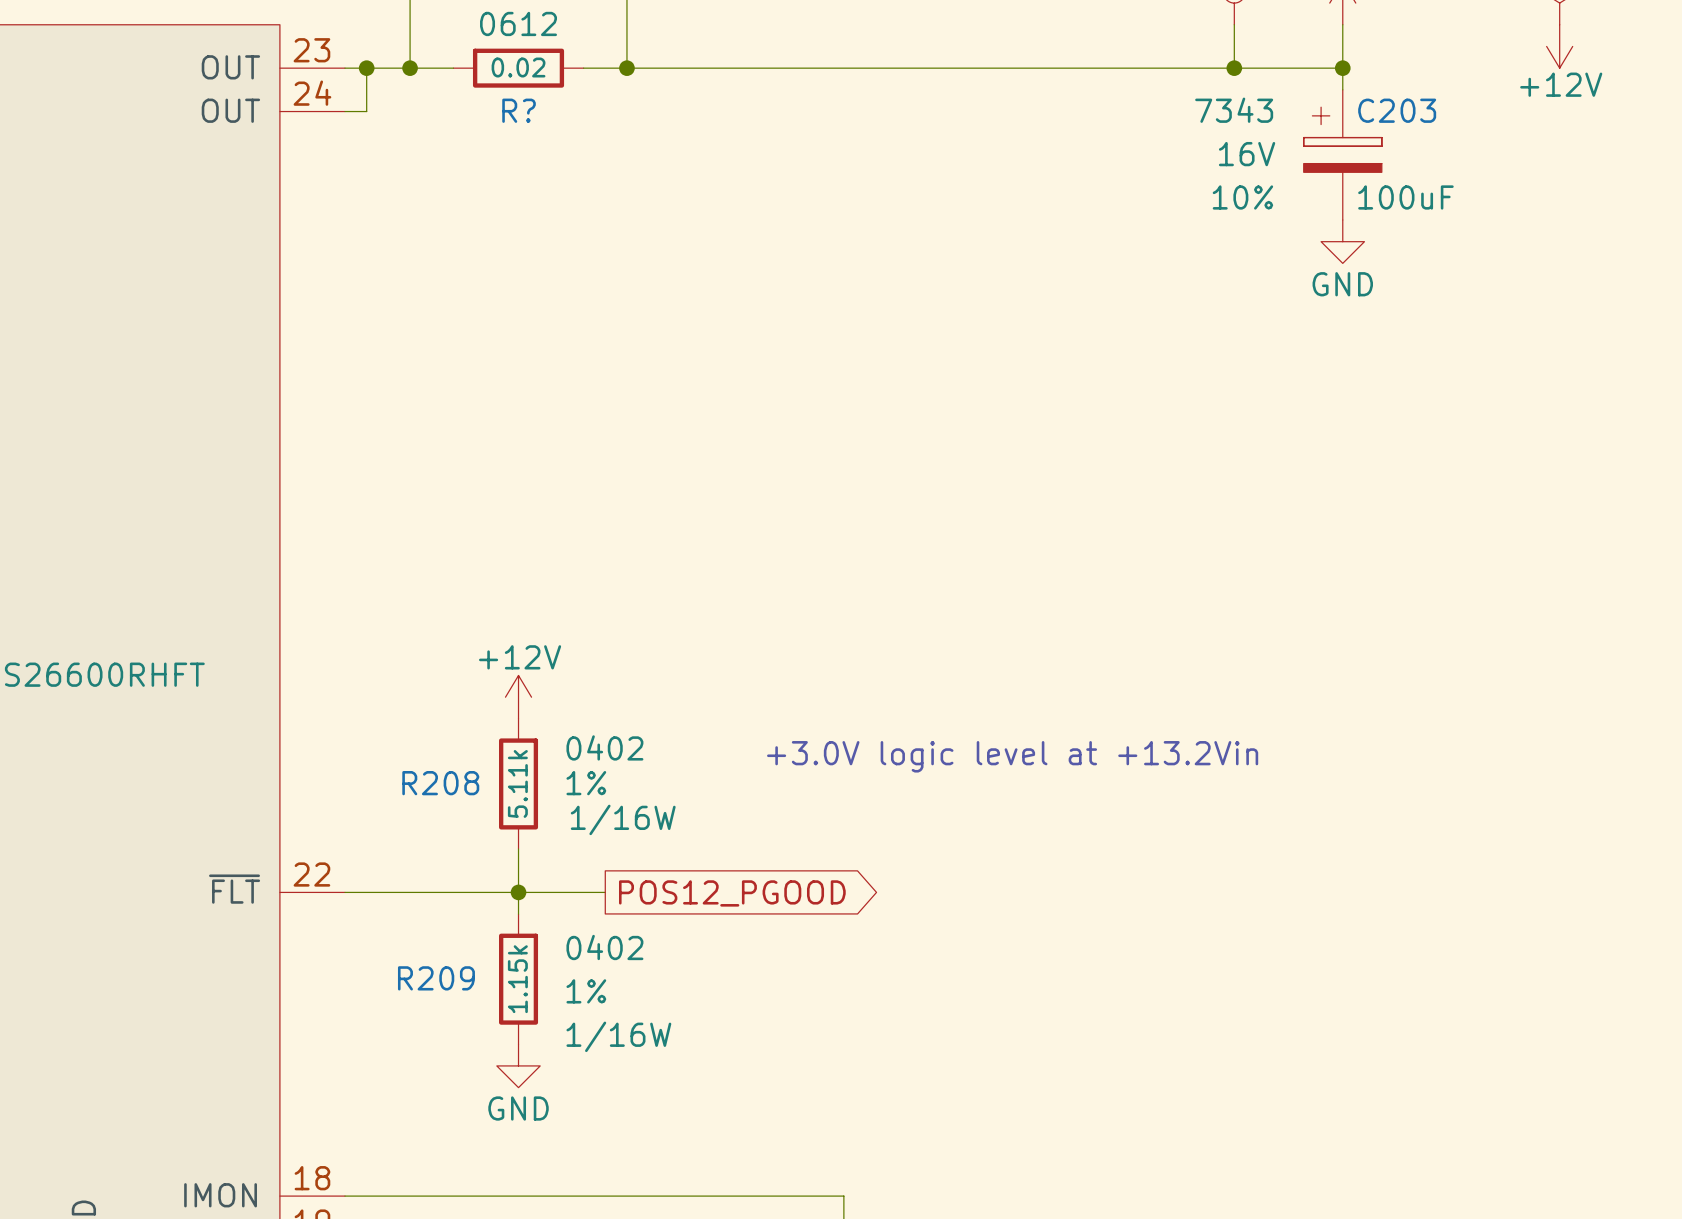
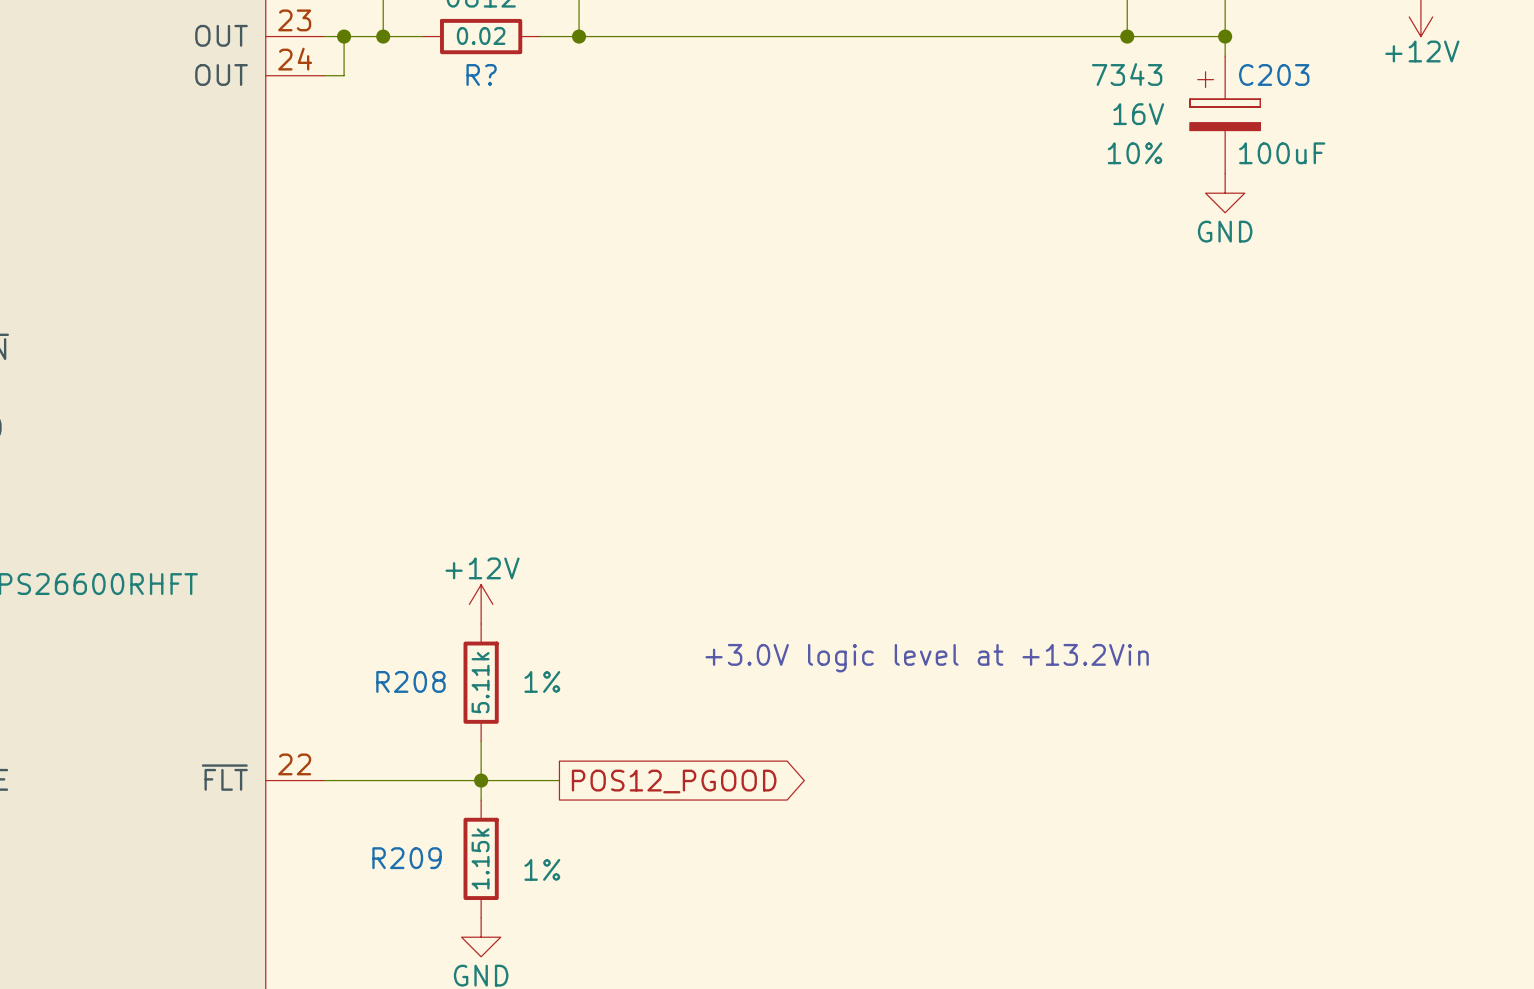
R208 text: 0402 (604, 747) -> none
R208 text: 1/16W (623, 819) -> none
R209 text: 0402 (604, 947) -> none
R209 text: 1/16W (618, 1036) -> none

